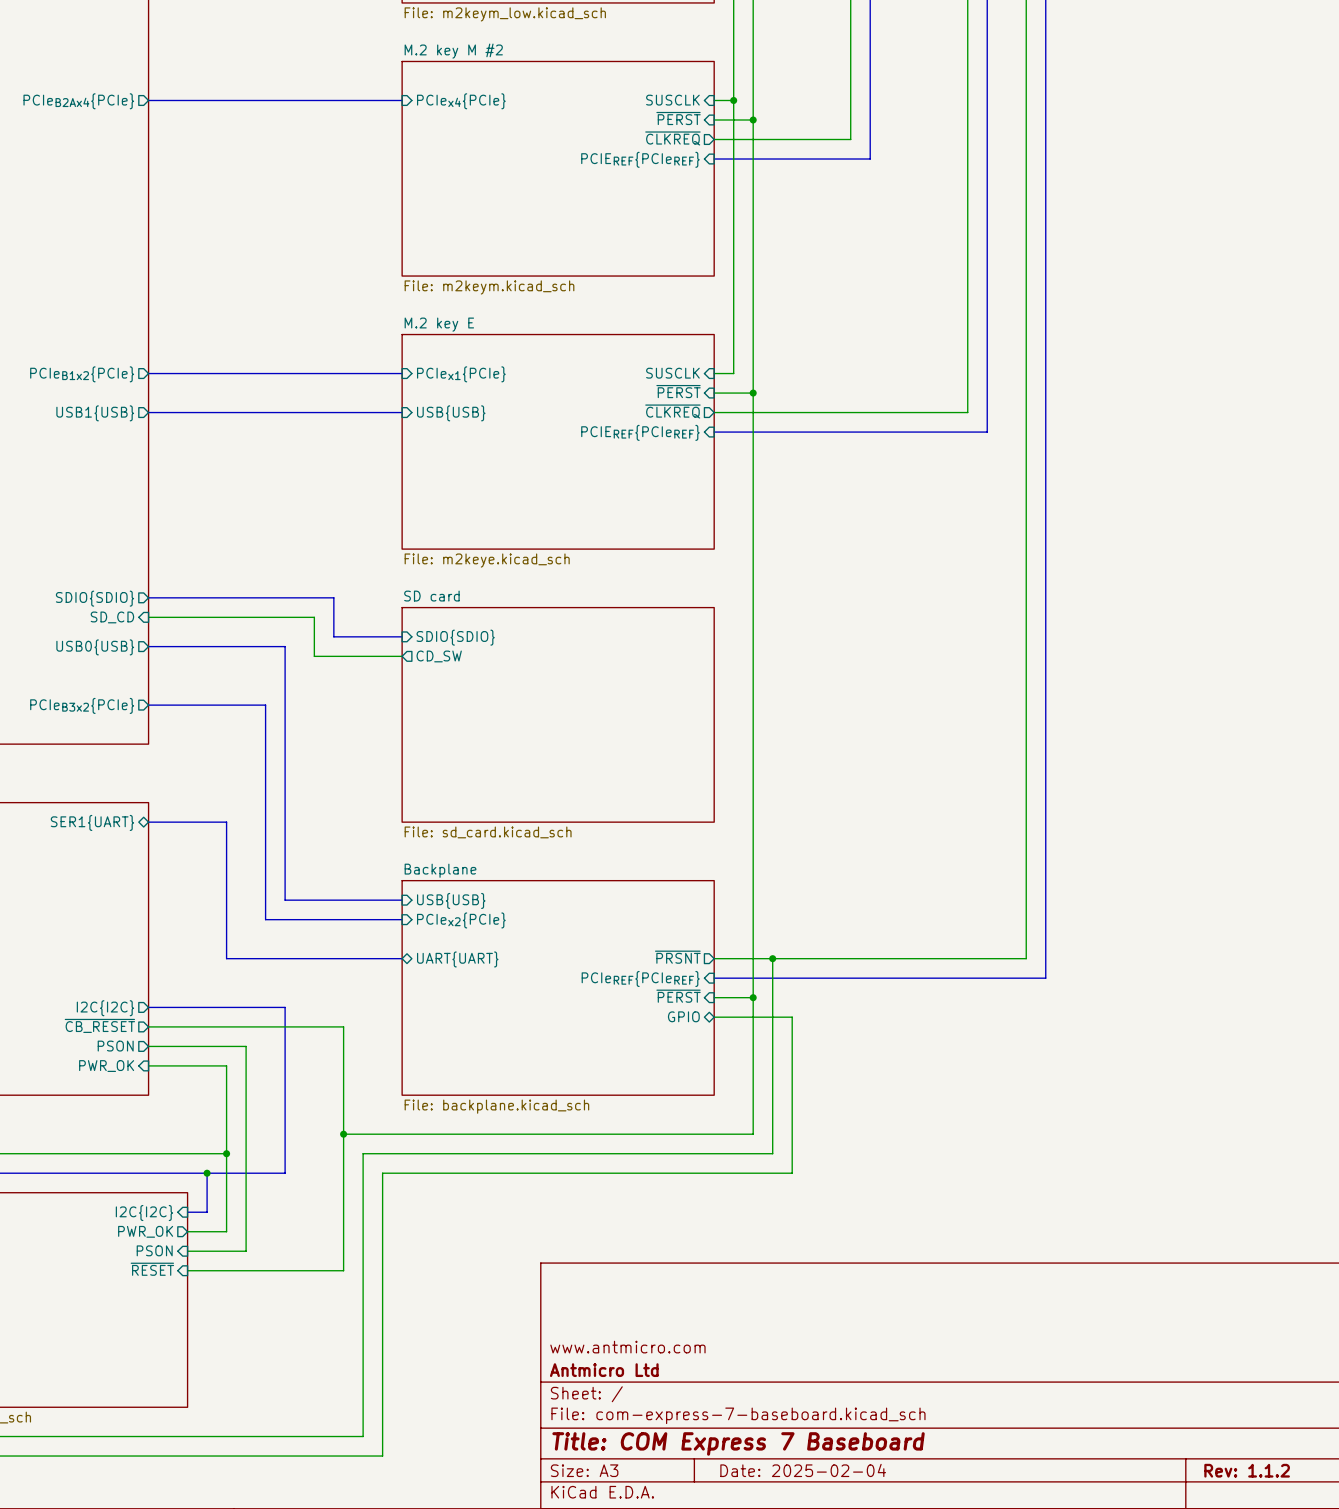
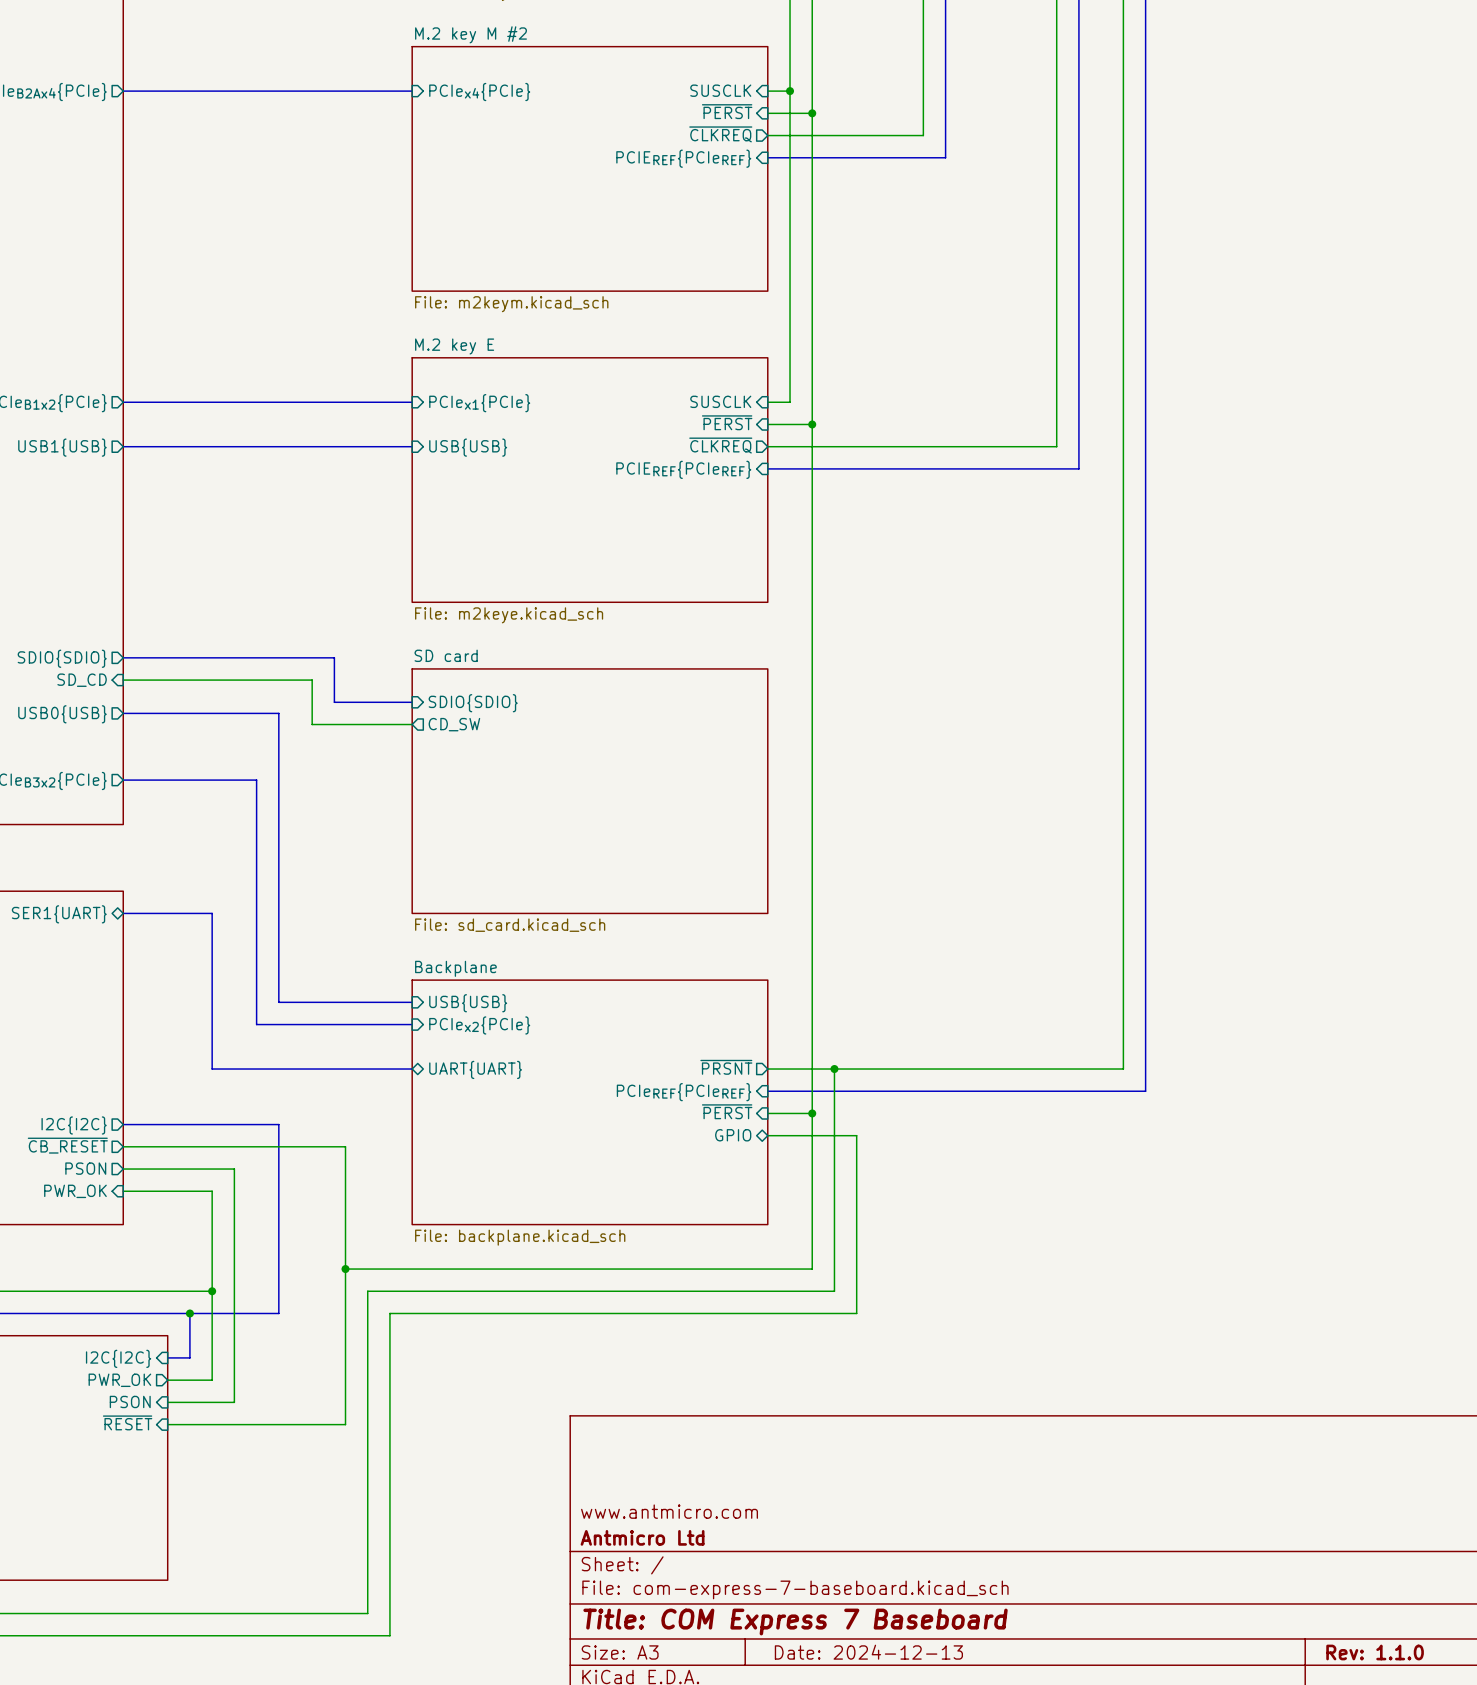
title block: Date: 2025-02-04 (803, 1470) -> Date: 2024-12-13 (868, 1652)
title block: Rev: 1.1.2 (1247, 1470) -> Rev: 1.1.0 (1375, 1652)

